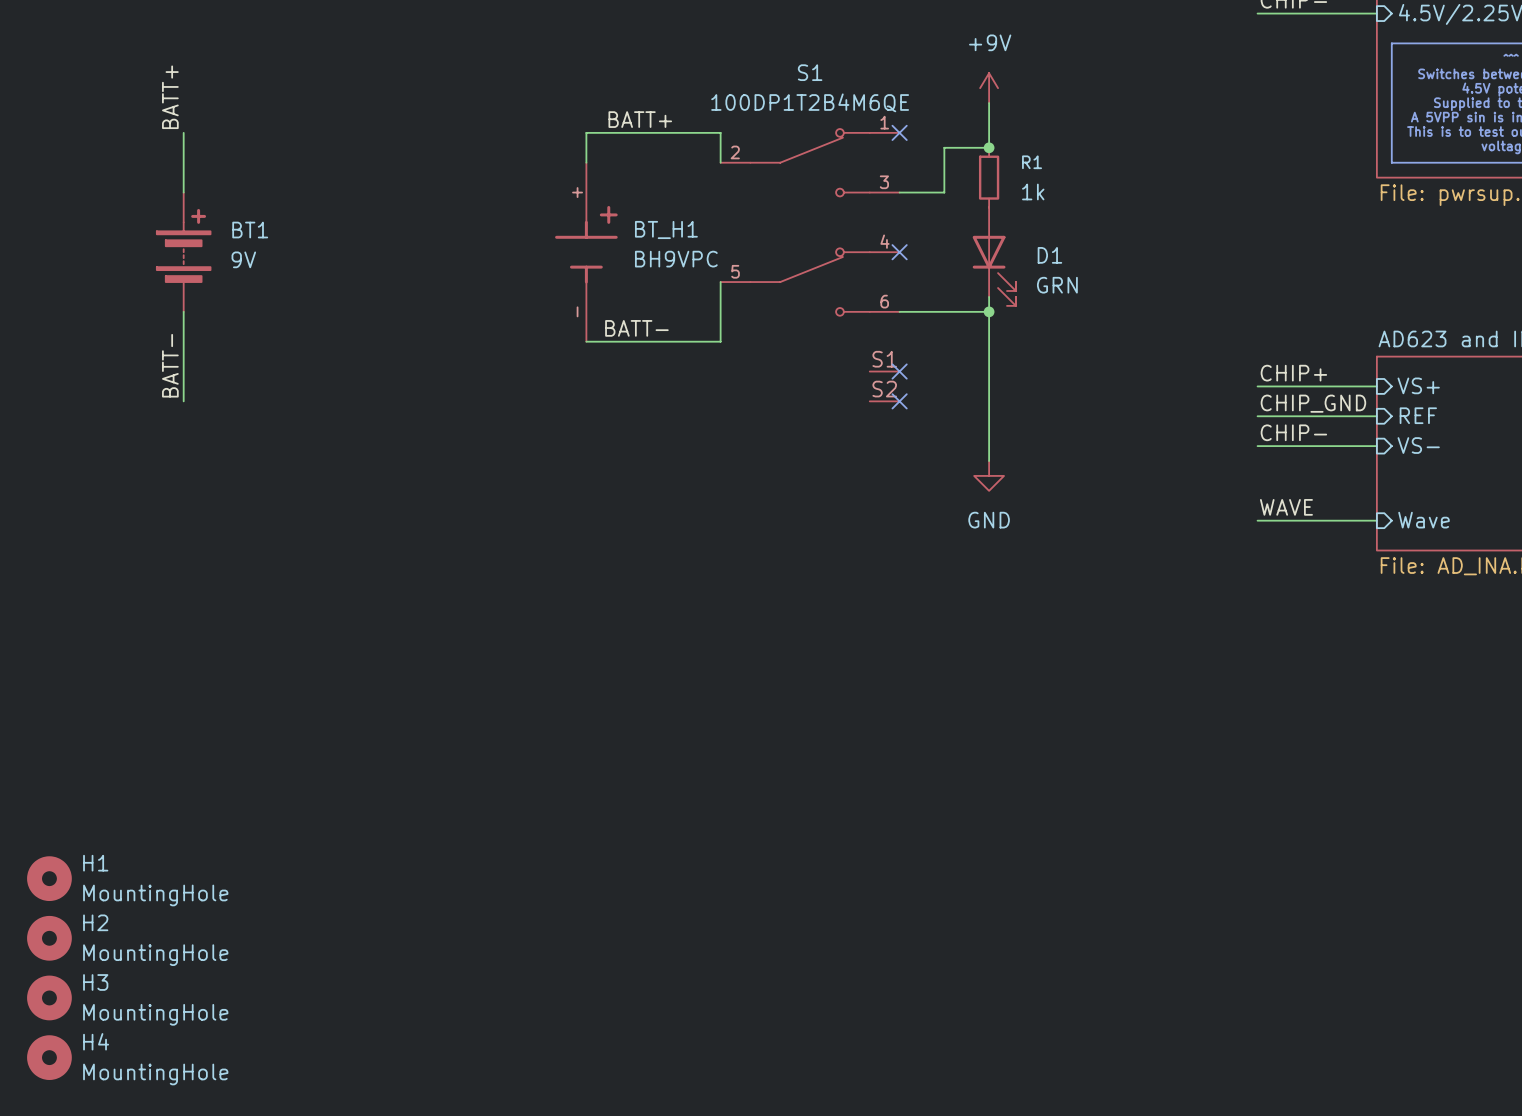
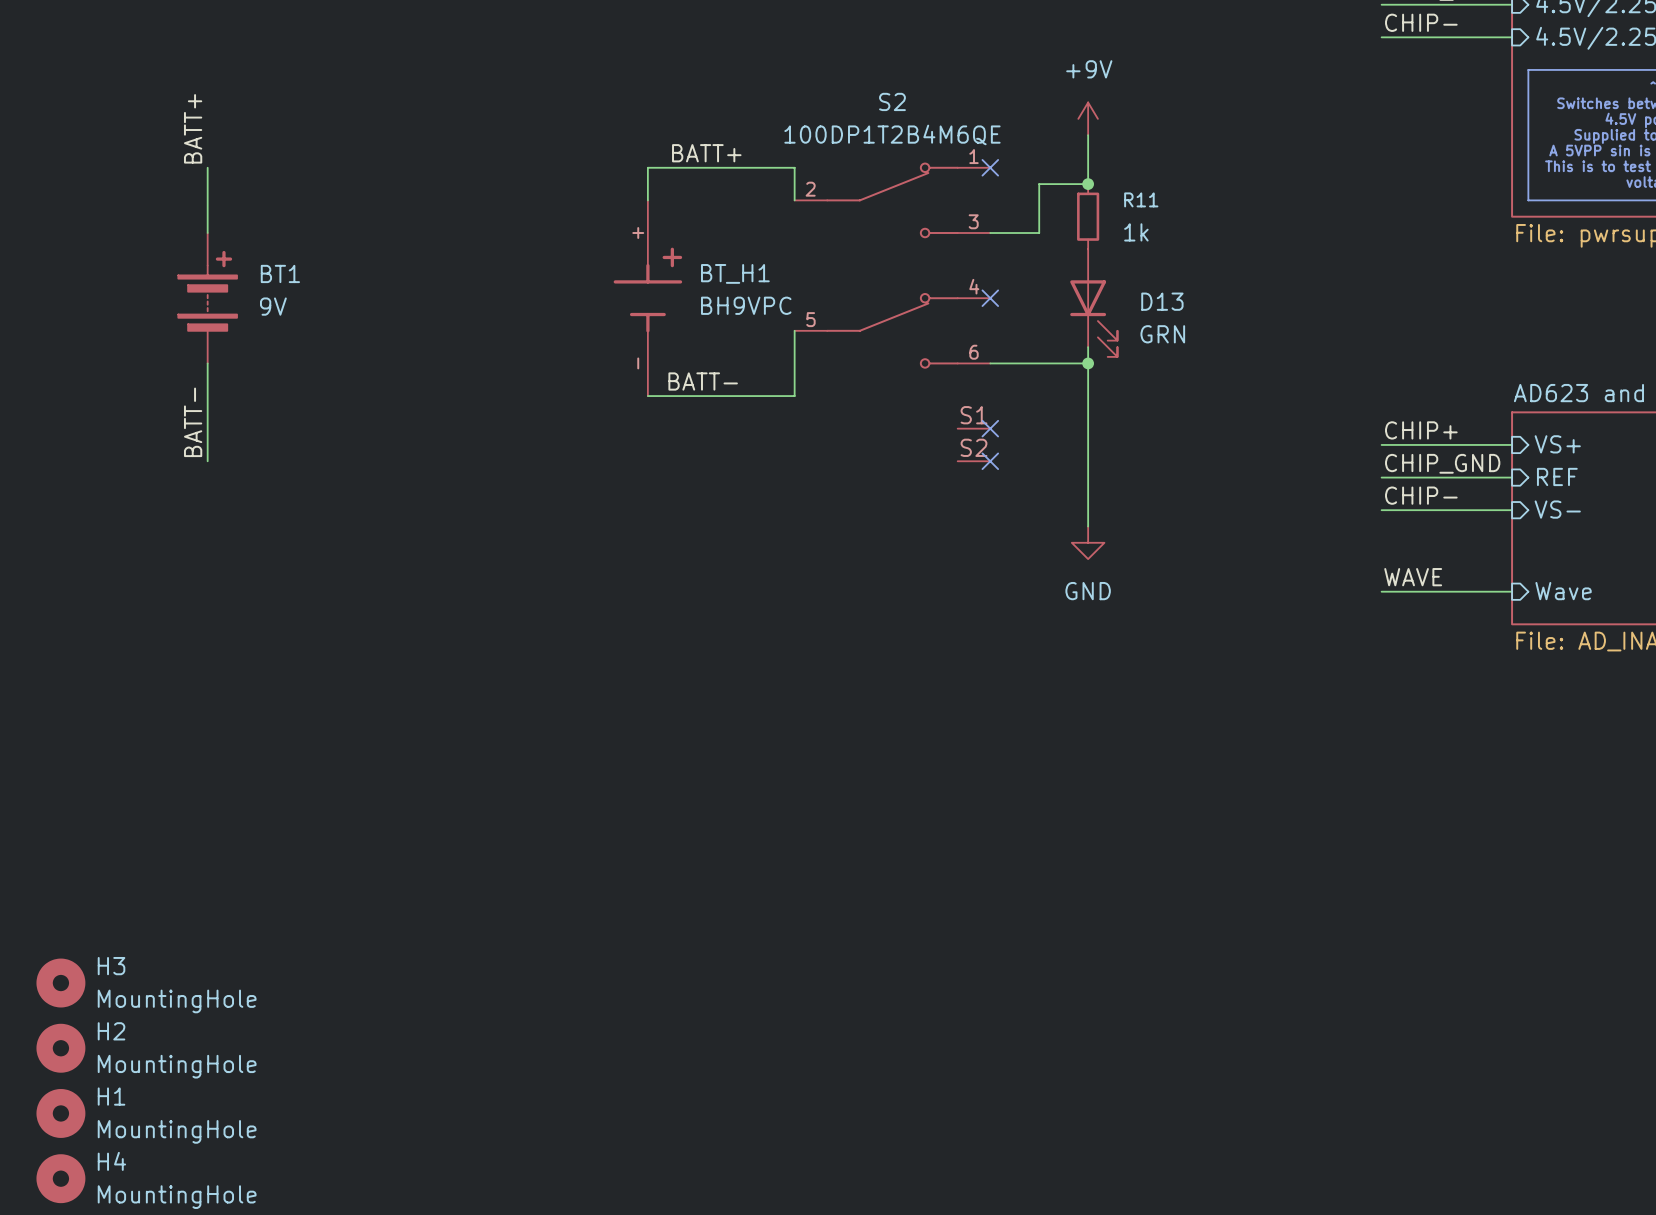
S1 name: S1 (810, 72) -> S2 (892, 101)
R1 name: R1 (1032, 162) -> R11 (1141, 199)
D1 name: D1 (1049, 255) -> D13 (1162, 301)
H1 name: H1 (95, 863) -> H3 (111, 966)
H3 name: H3 (95, 982) -> H1 (111, 1096)

